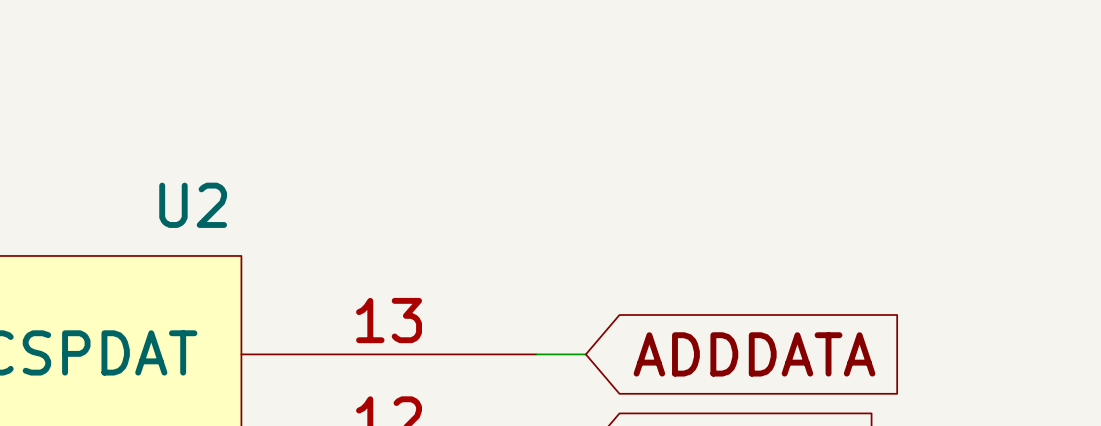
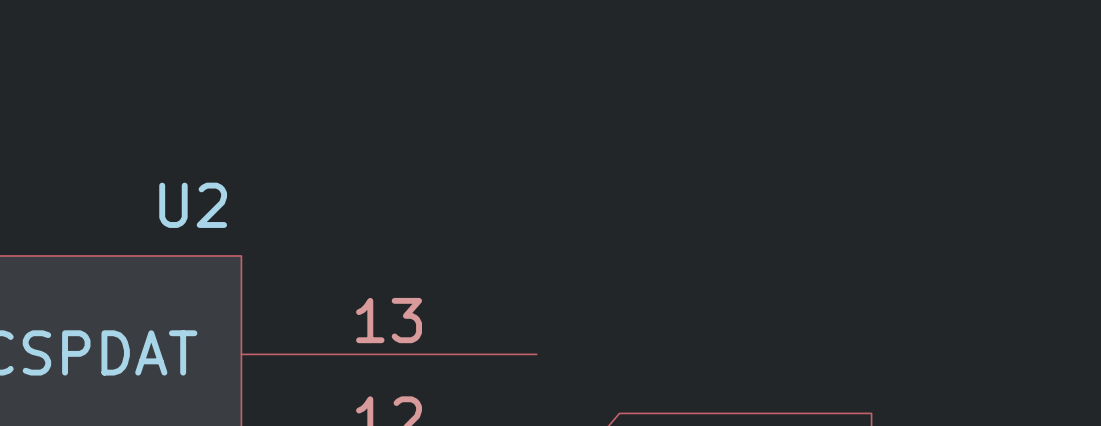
wire: (536, 354) (585, 354) -> none
global label: ADDDATA (754, 354) -> none

